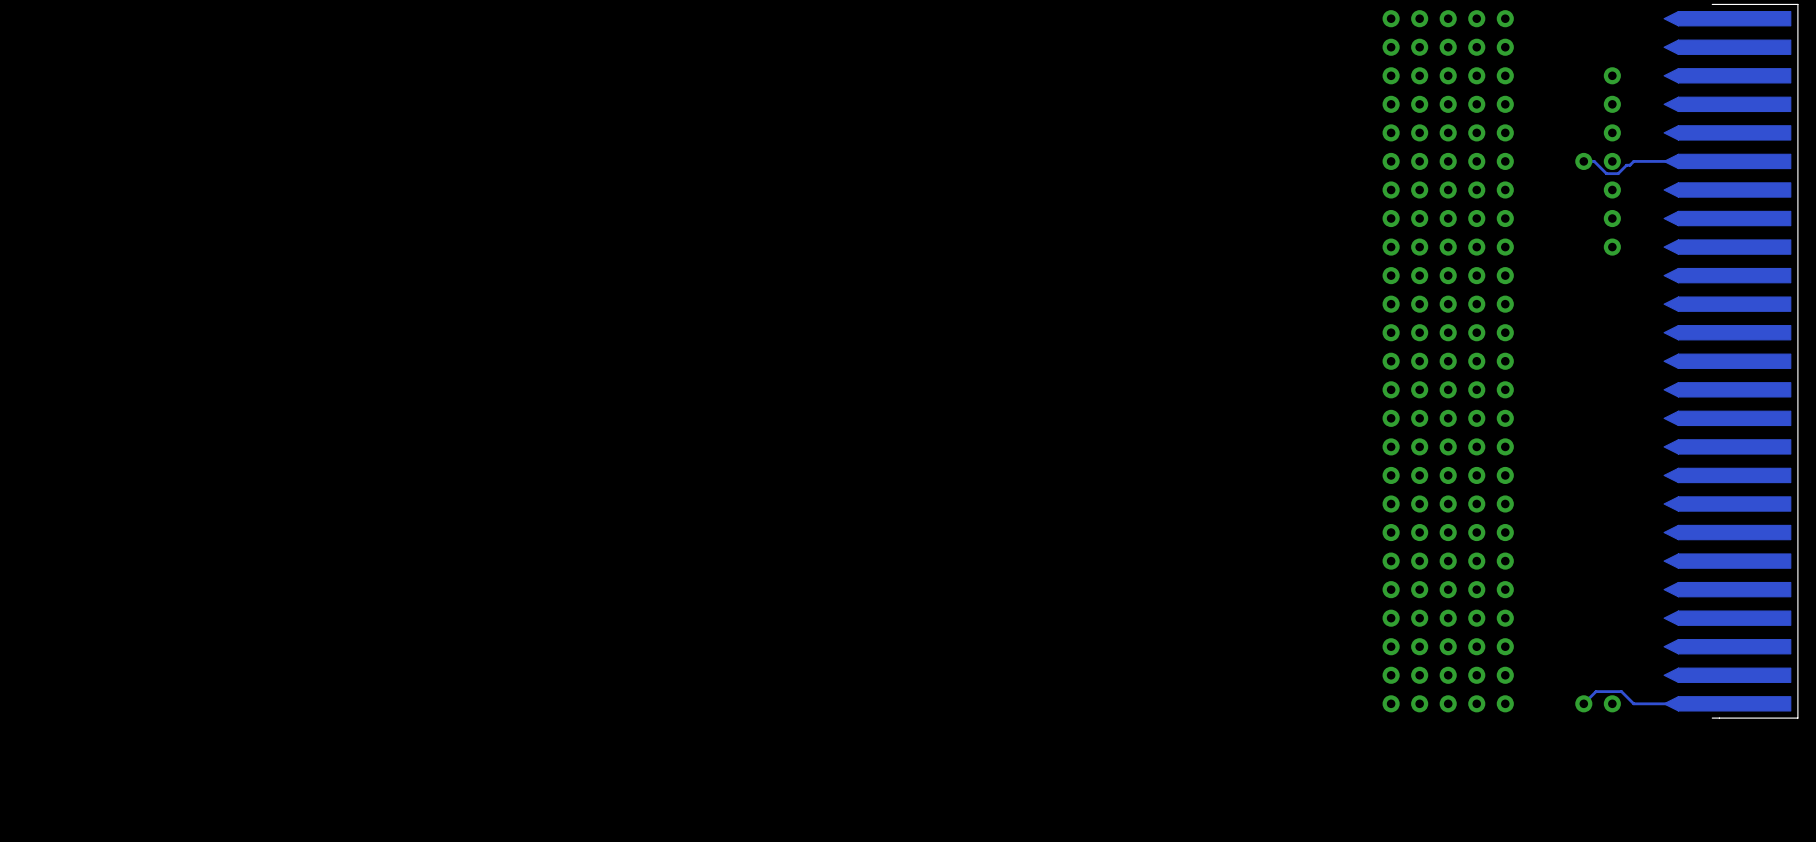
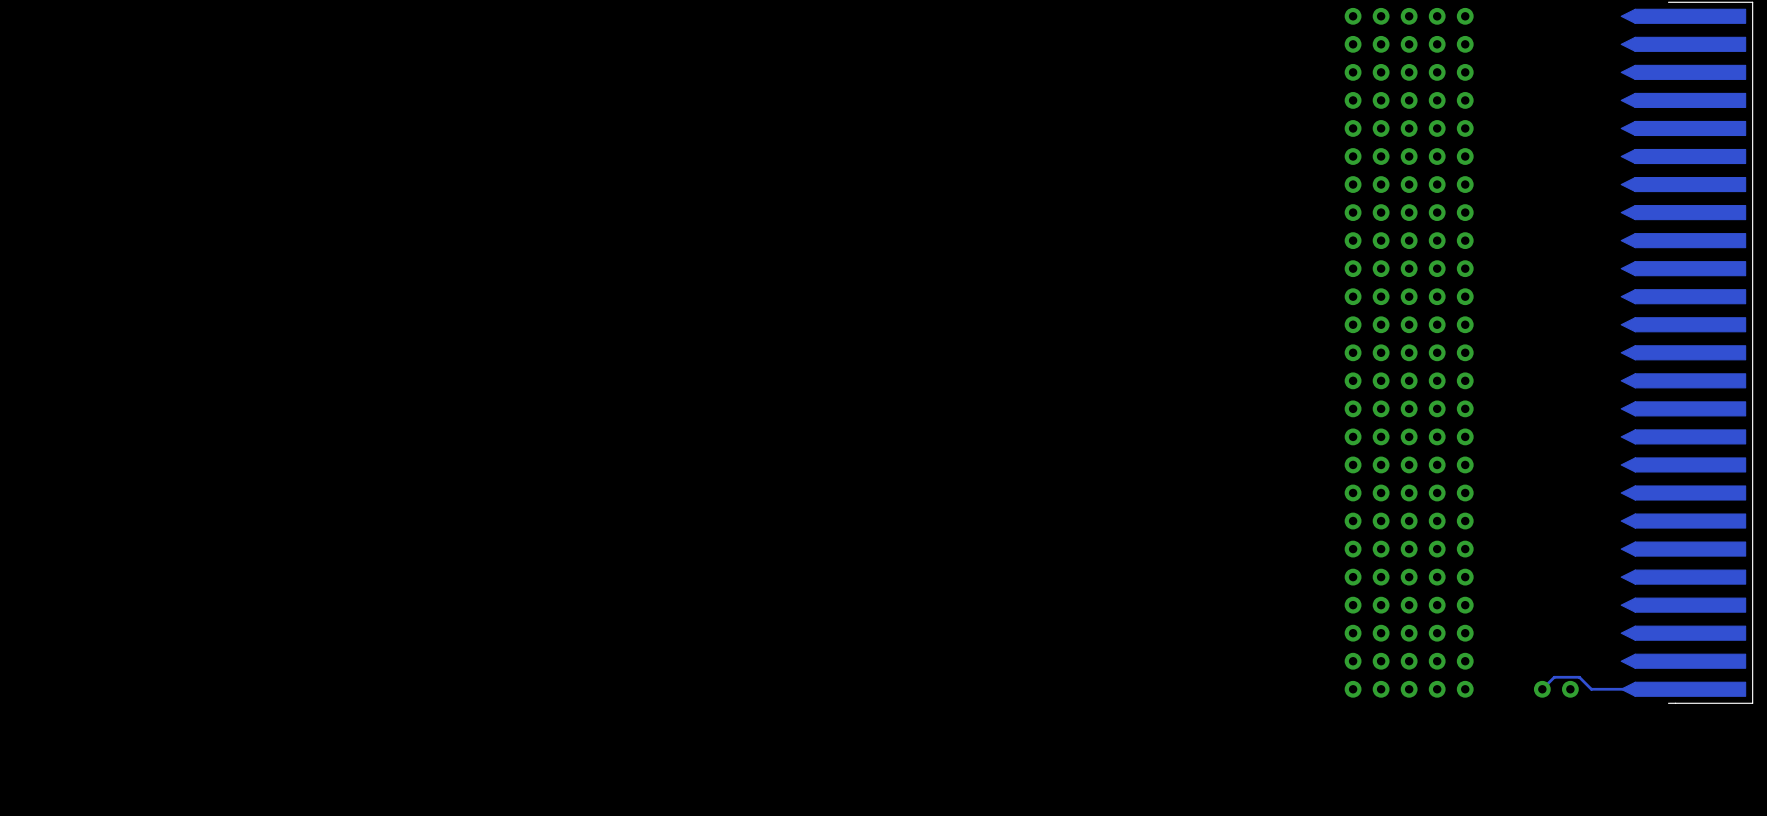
part: (1612, 75) -> none
part: (1612, 104) -> none
part: (1612, 132) -> none
part: (1583, 161) -> none
part: (1612, 161) -> none
track: (1762, 161) (1633, 161) (1618, 173) (1606, 173) (1594, 161) (1583, 161) -> none
part: (1612, 189) -> none
part: (1612, 218) -> none
part: (1612, 247) -> none

